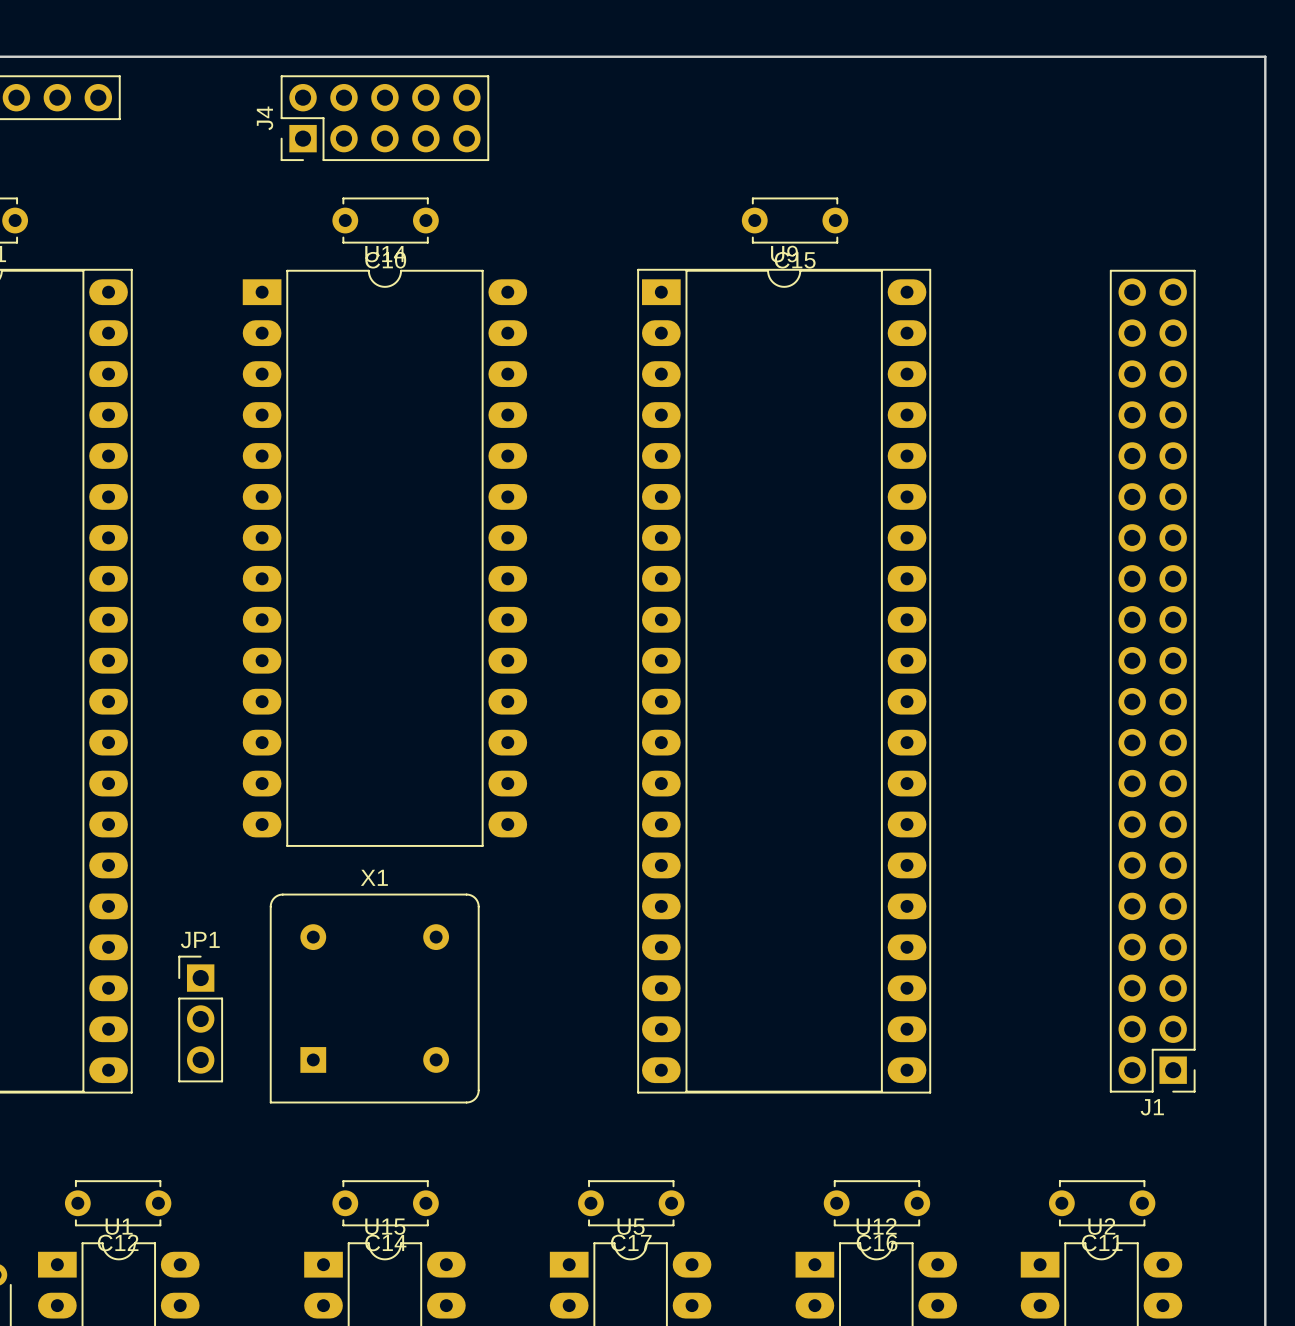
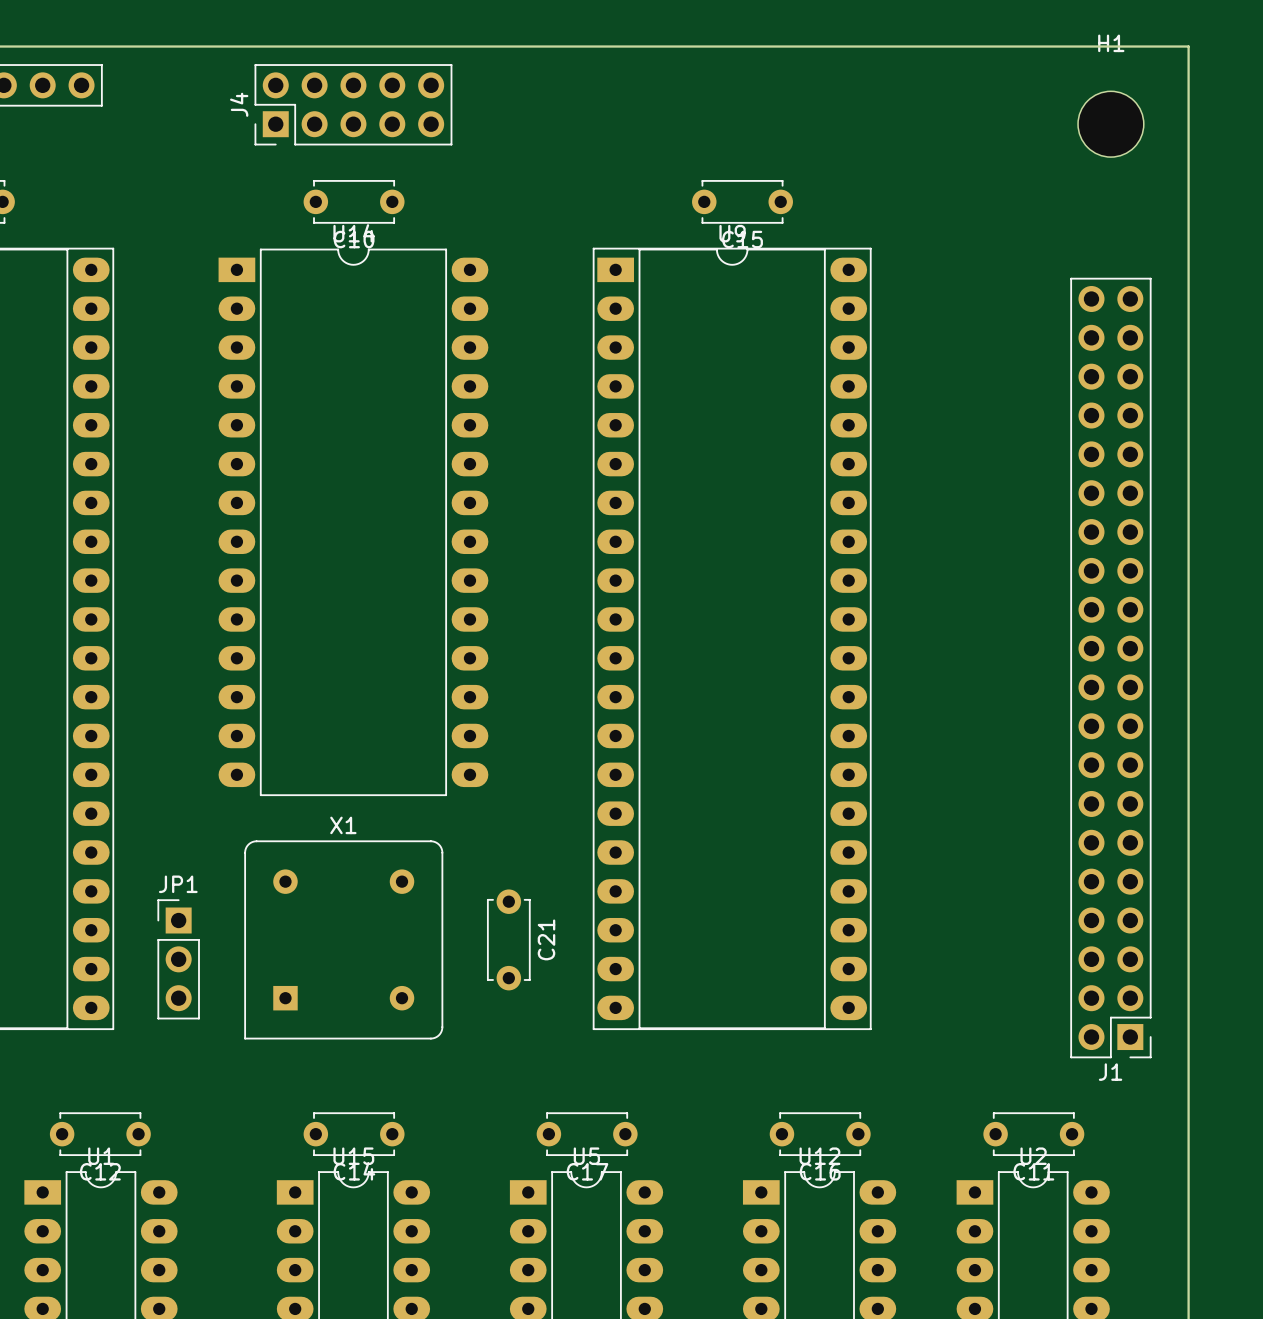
H1: none -> (1110, 124)
J1 position: (1152, 681) -> (1110, 668)
C21: none -> (508, 939)

